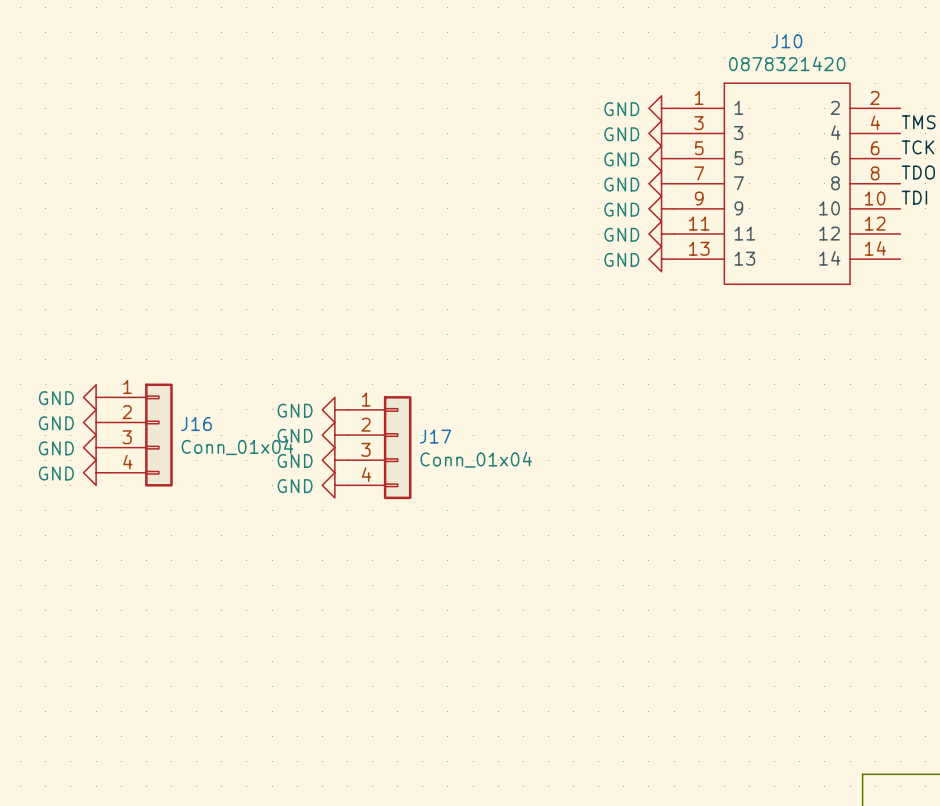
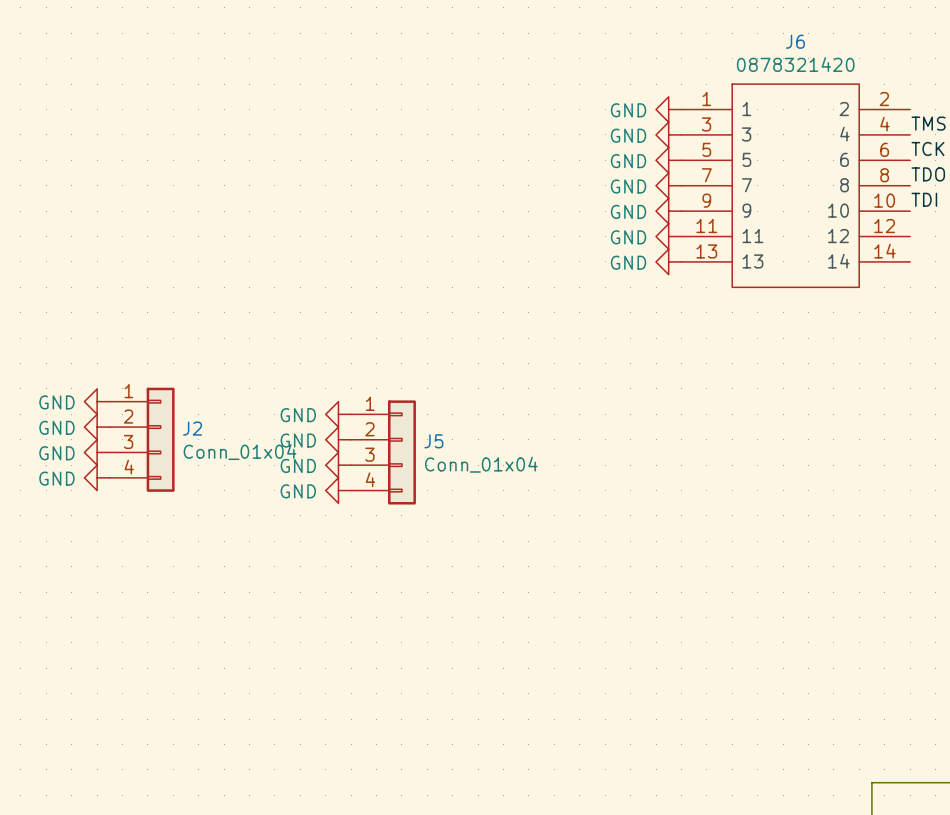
J10 name: J10 (786, 41) -> J6 (795, 41)
J16 name: J16 (196, 424) -> J2 (192, 428)
J17 name: J17 (435, 436) -> J5 (433, 441)

